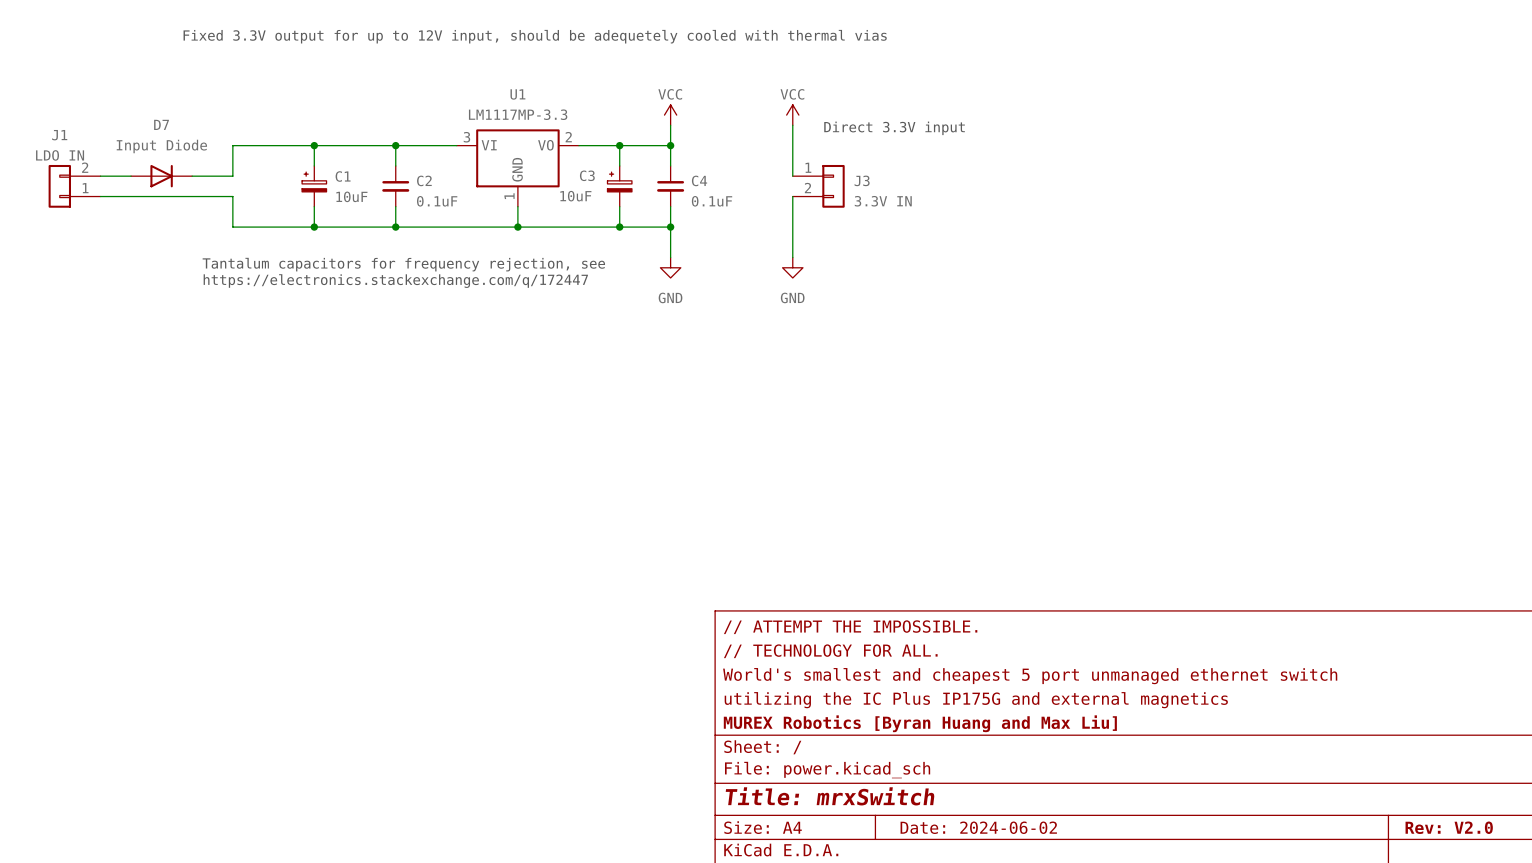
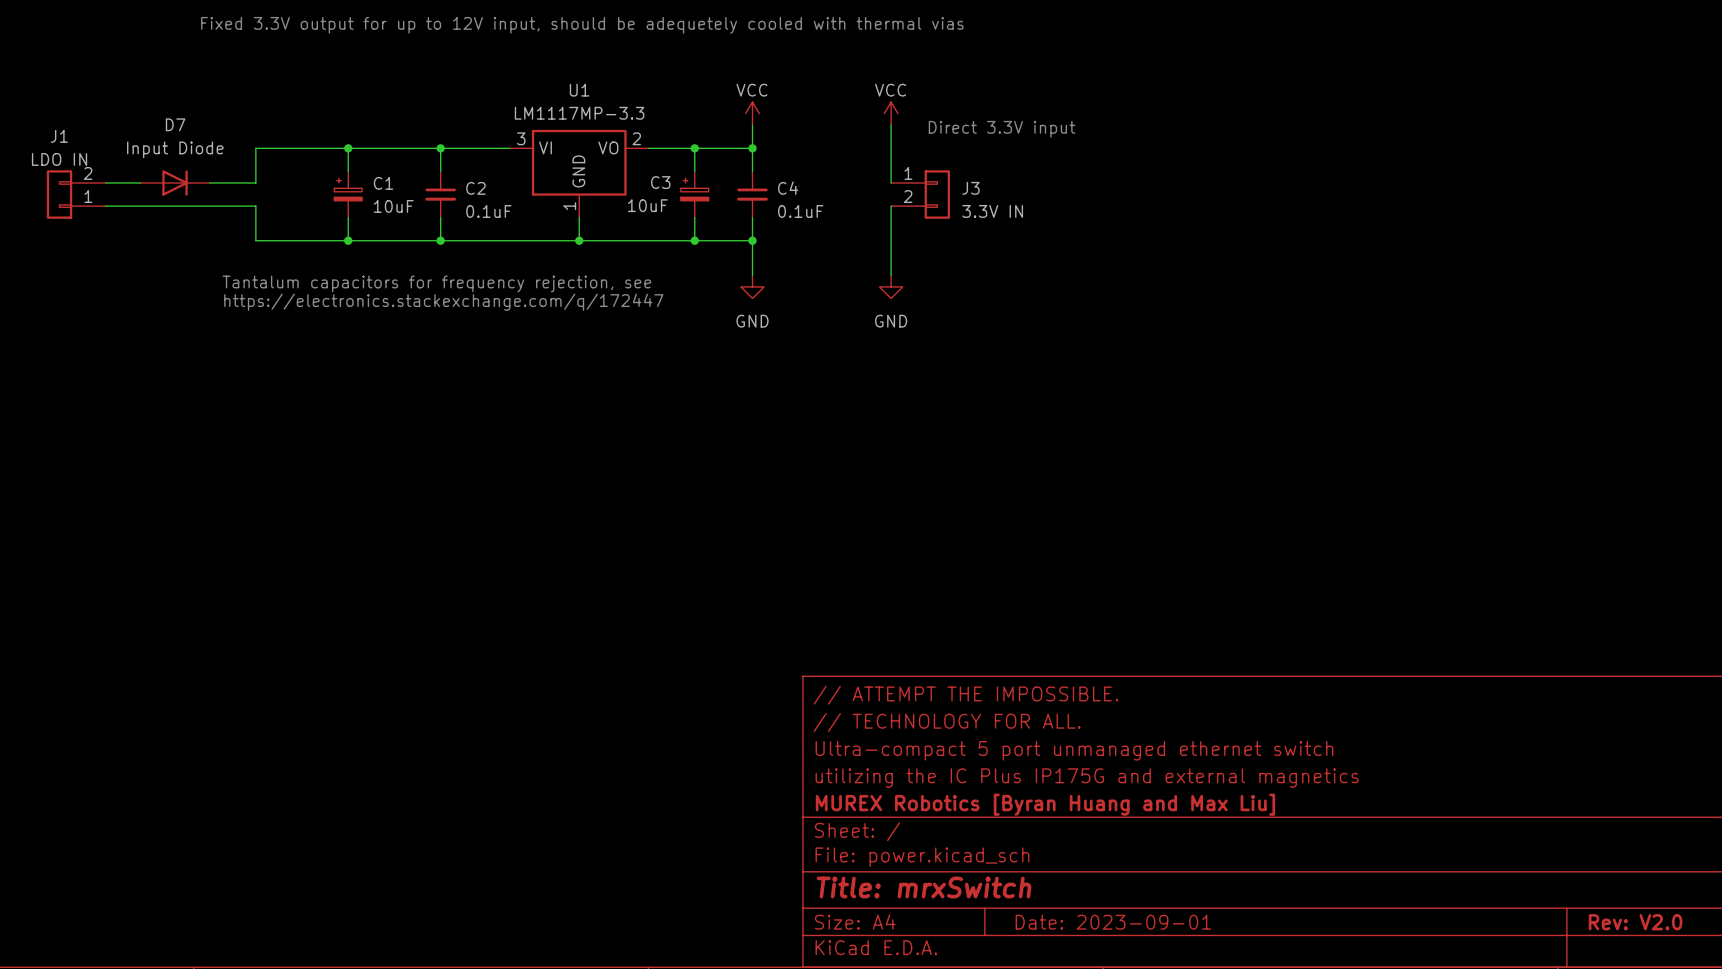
title block: World's smallest and cheapest 5 port unmanaged ethernet switch (1030, 676) -> Ultra-compact 5 port unmanaged ethernet switch (1074, 750)
title block: Date: 2024-06-02 (978, 827) -> Date: 2023-09-01 (1113, 922)

